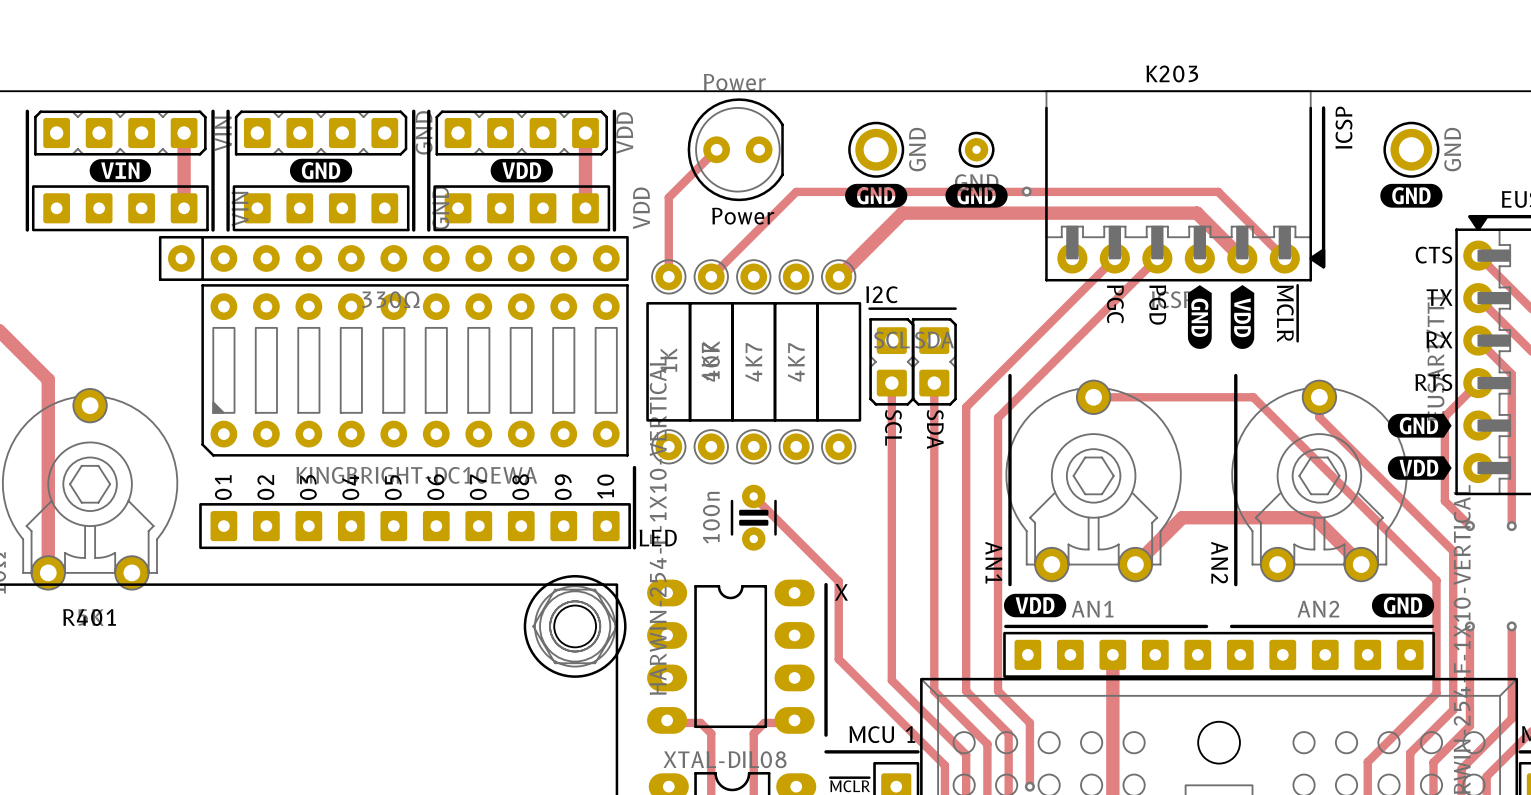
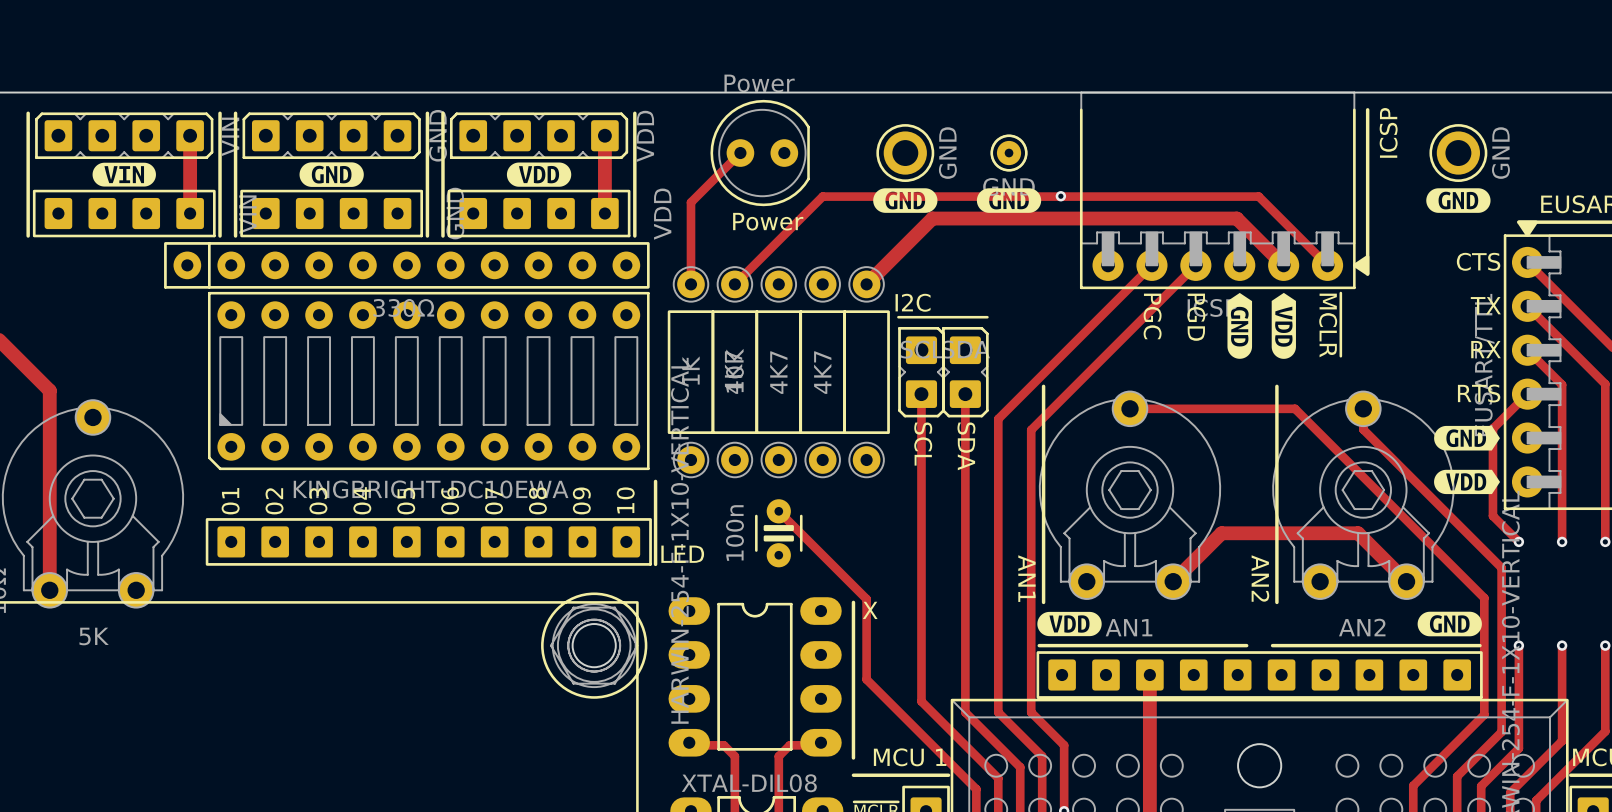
K203 name: K203 (1172, 73) -> none
R401 name: R401 (89, 617) -> none

